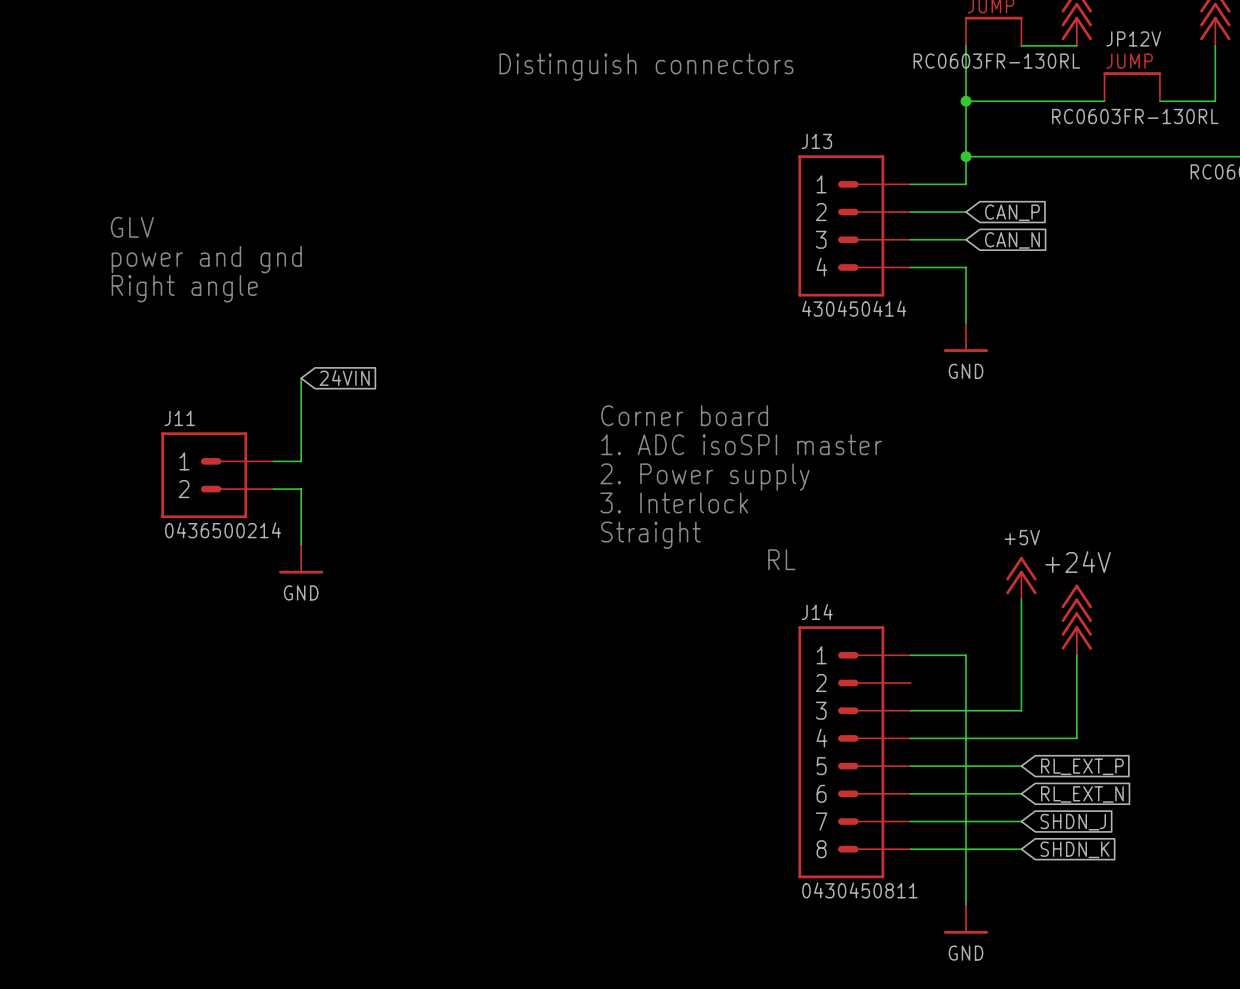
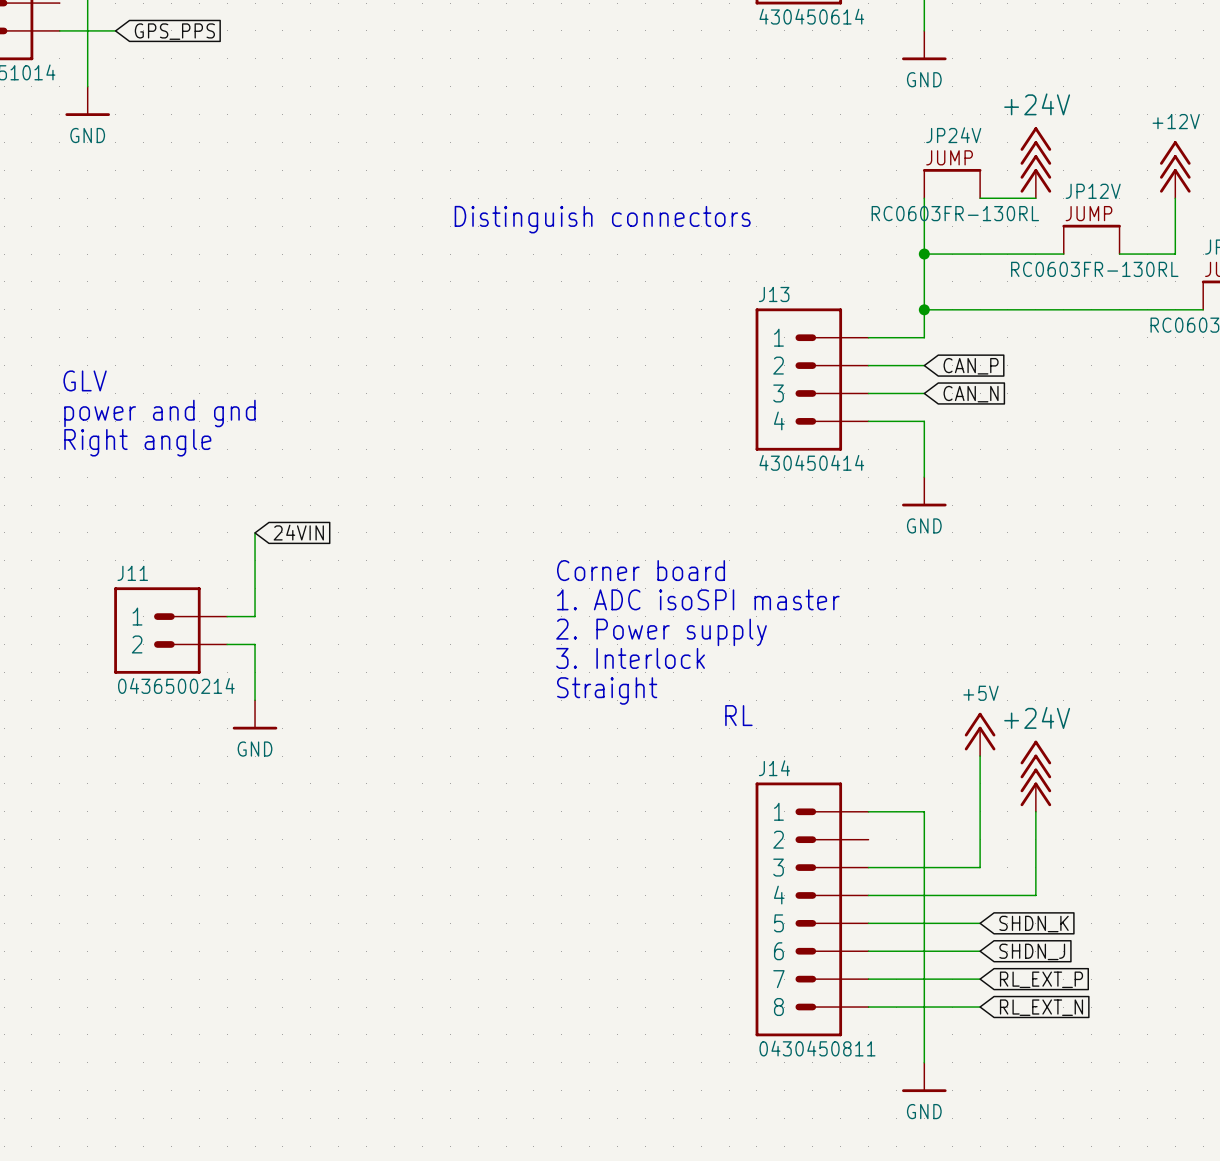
global label: RL_EXT_P (1082, 766) -> SHDN_K (1034, 924)
global label: RL_EXT_N (1082, 794) -> SHDN_J (1032, 951)
global label: SHDN_J (1073, 822) -> RL_EXT_P (1041, 979)
global label: SHDN_K (1074, 849) -> RL_EXT_N (1041, 1007)

